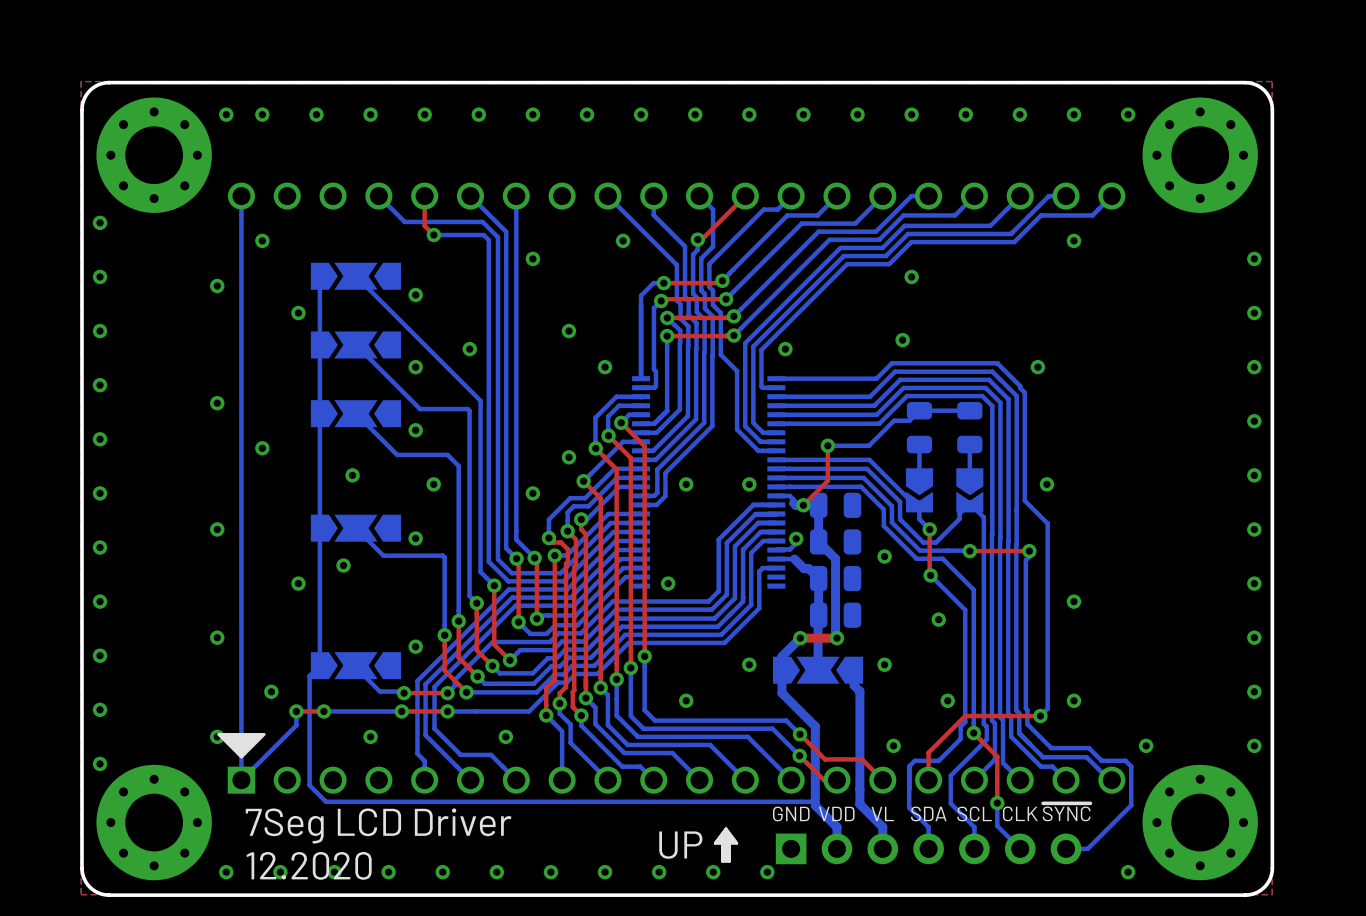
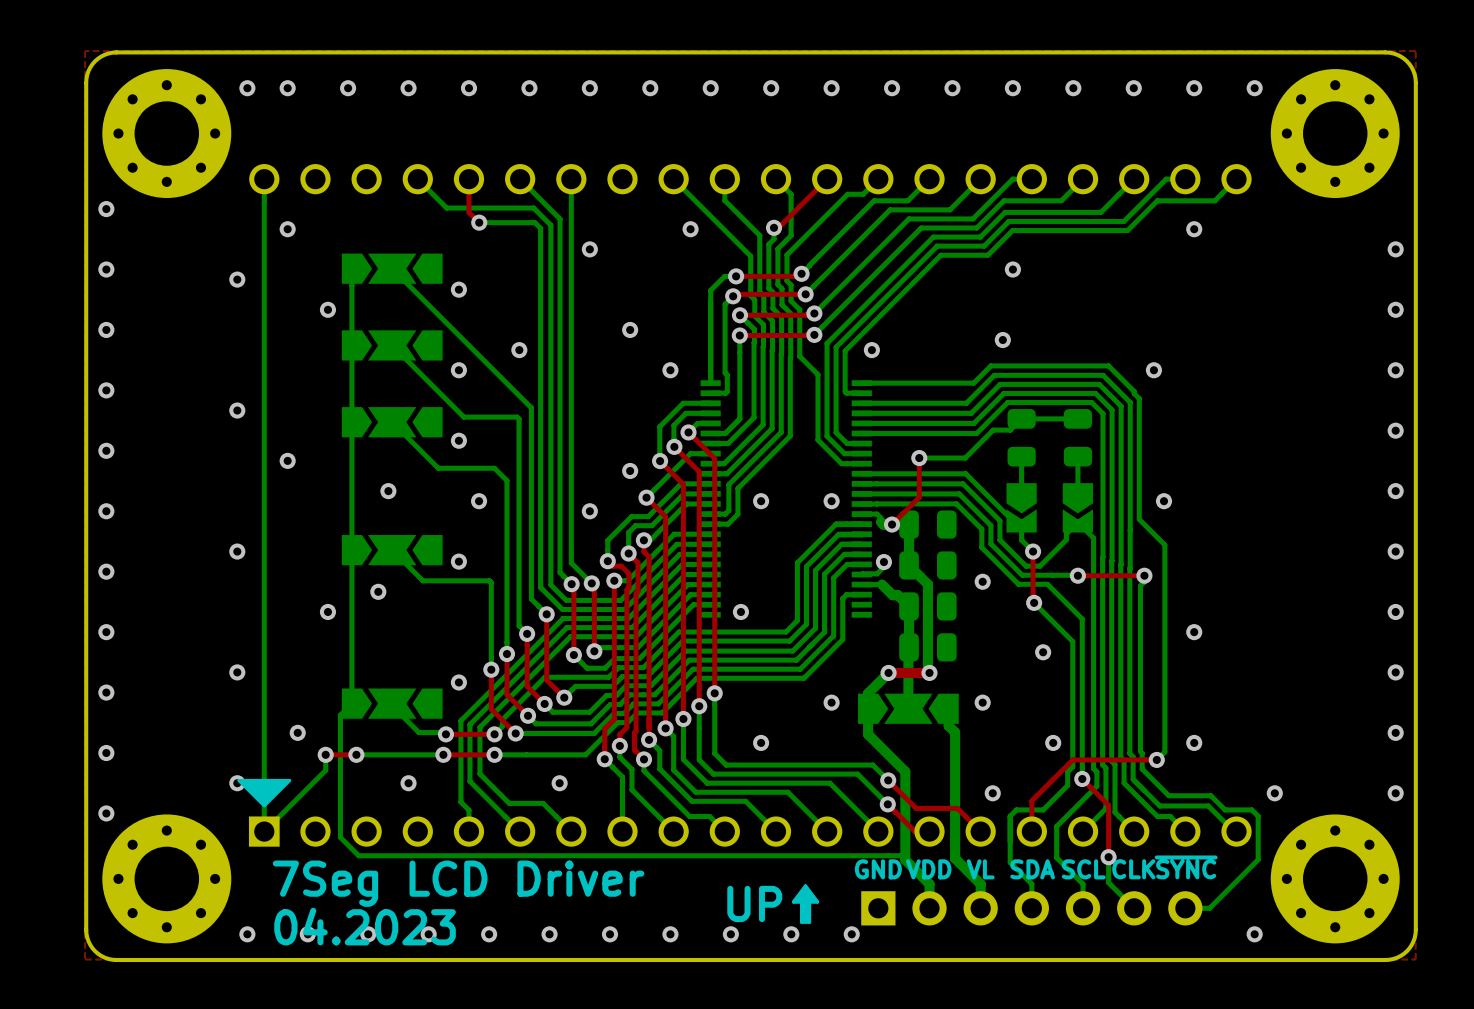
text: 12.2020 (309, 865) -> 04.2023 (365, 926)

